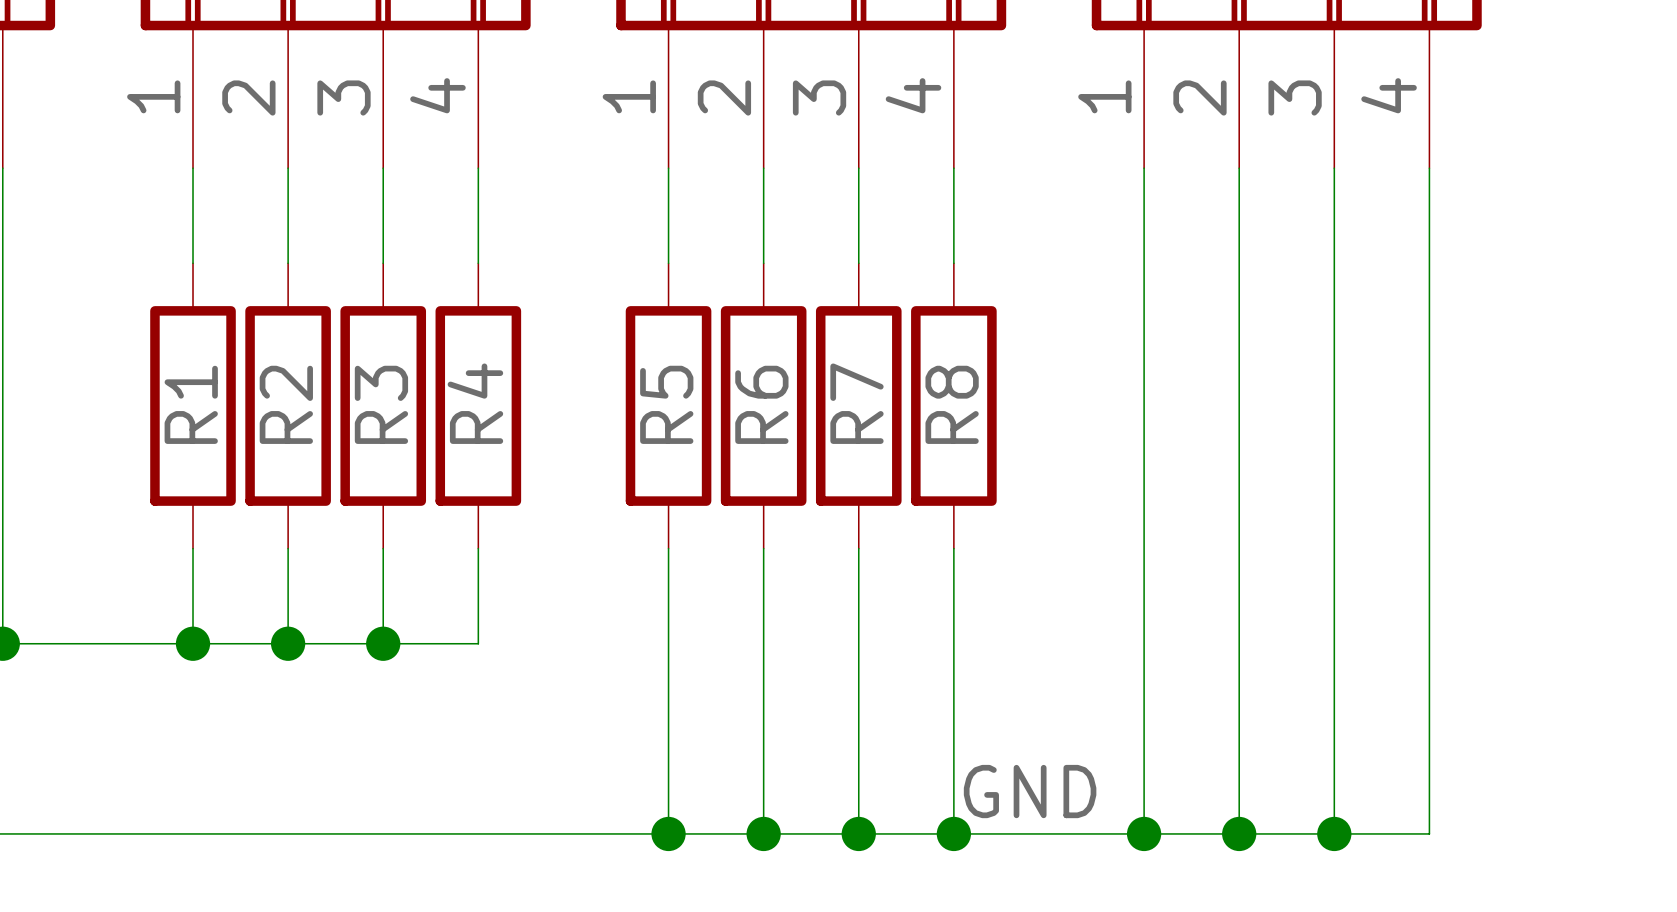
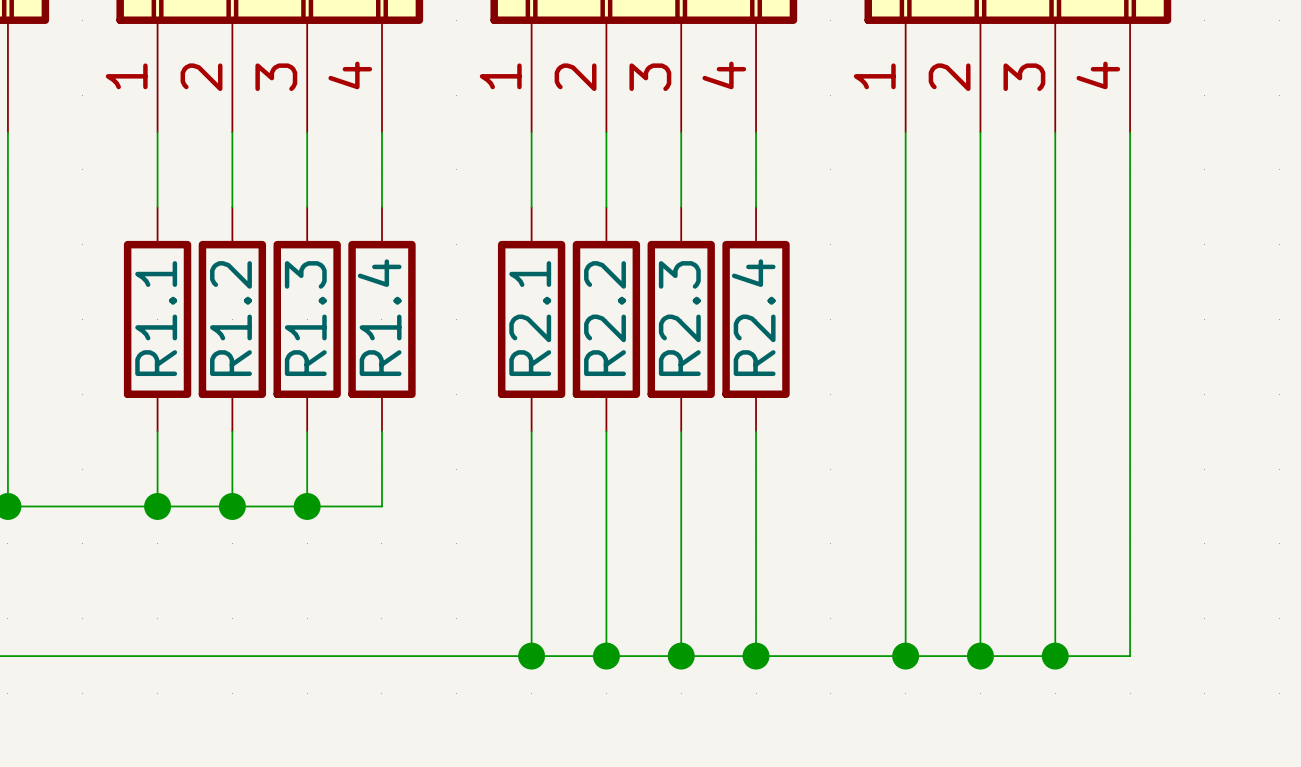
R4 name: R4 (475, 403) -> R1.4 (379, 317)
R7 name: R7 (856, 403) -> R2.3 (679, 318)
R1 name: R1 (191, 404) -> R1.1 (156, 318)
R2 name: R2 (286, 404) -> R1.2 (230, 318)
R3 name: R3 (381, 404) -> R1.3 (305, 318)
R5 name: R5 (666, 404) -> R2.1 (530, 318)
R6 name: R6 (761, 404) -> R2.2 (605, 318)
R8 name: R8 (952, 404) -> R2.4 (753, 317)
label: GND (1030, 791) -> none

